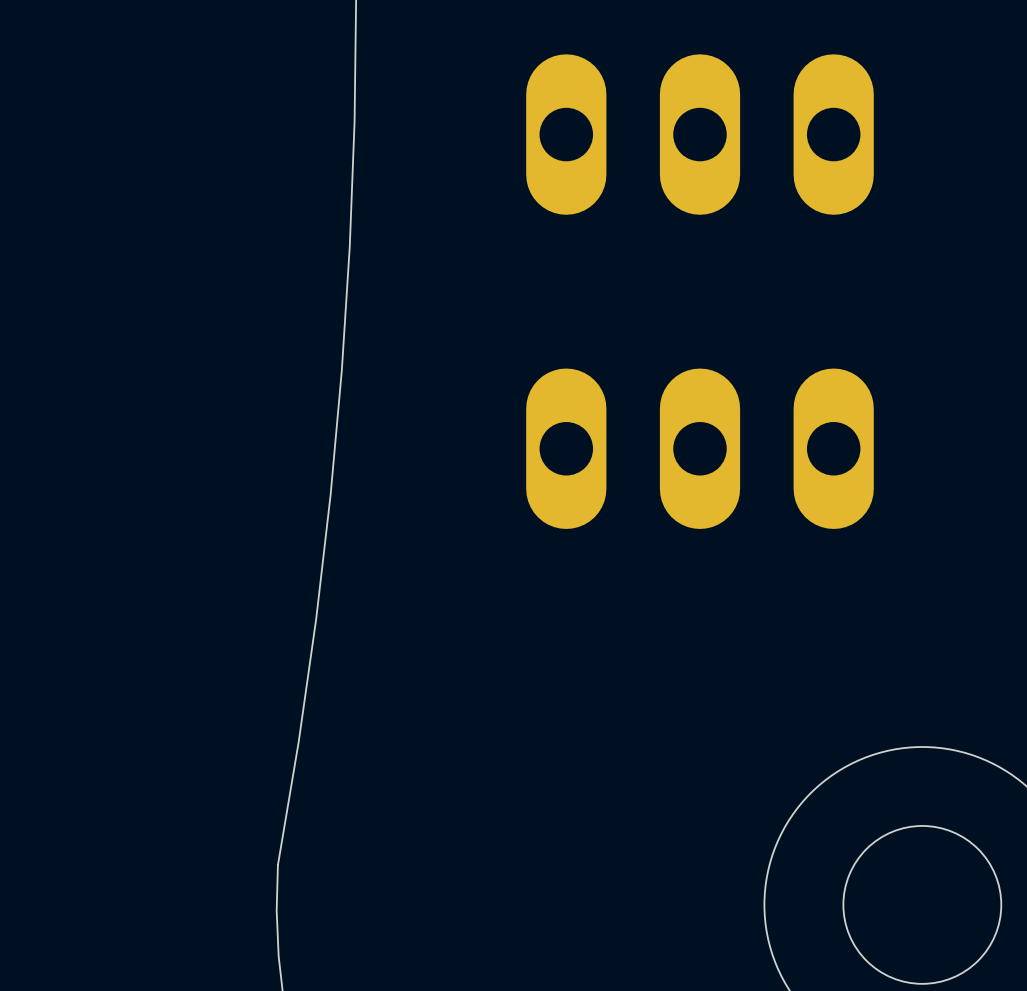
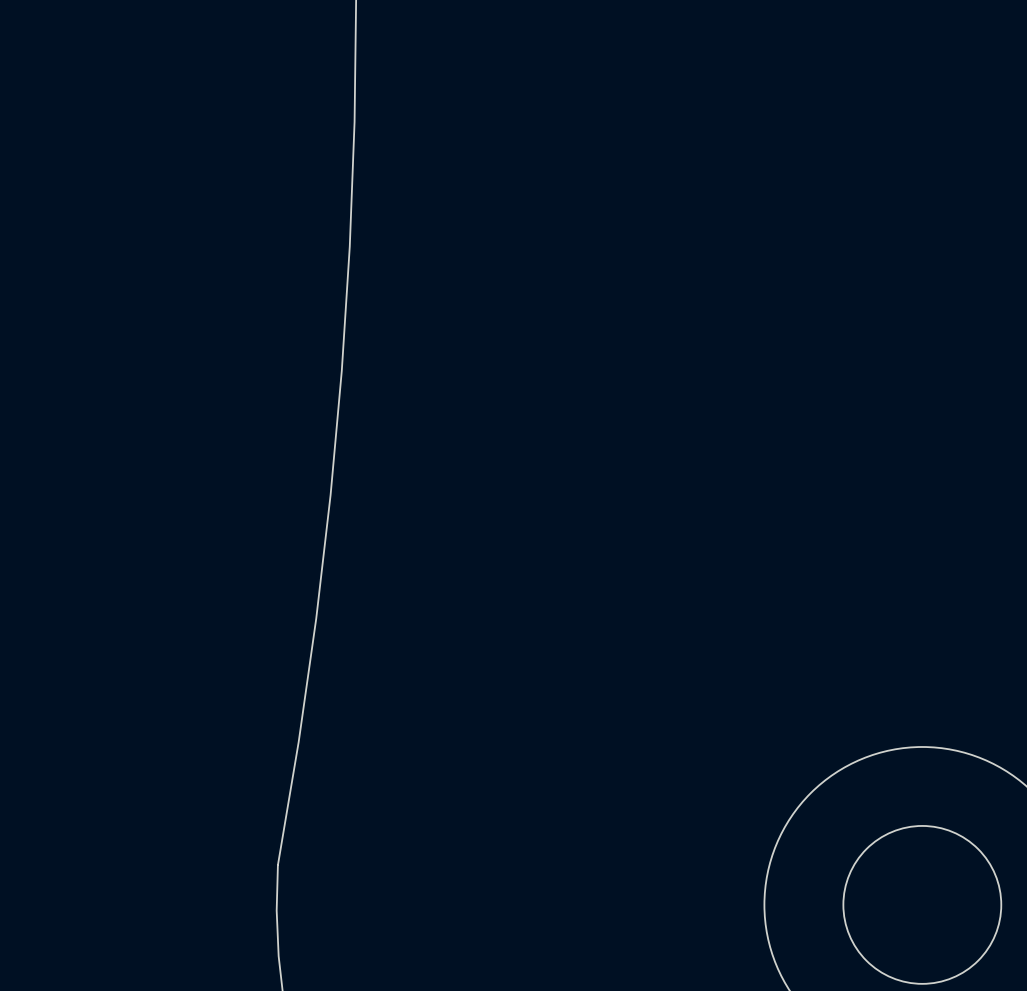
part: (700, 134) -> none
part: (700, 448) -> none

